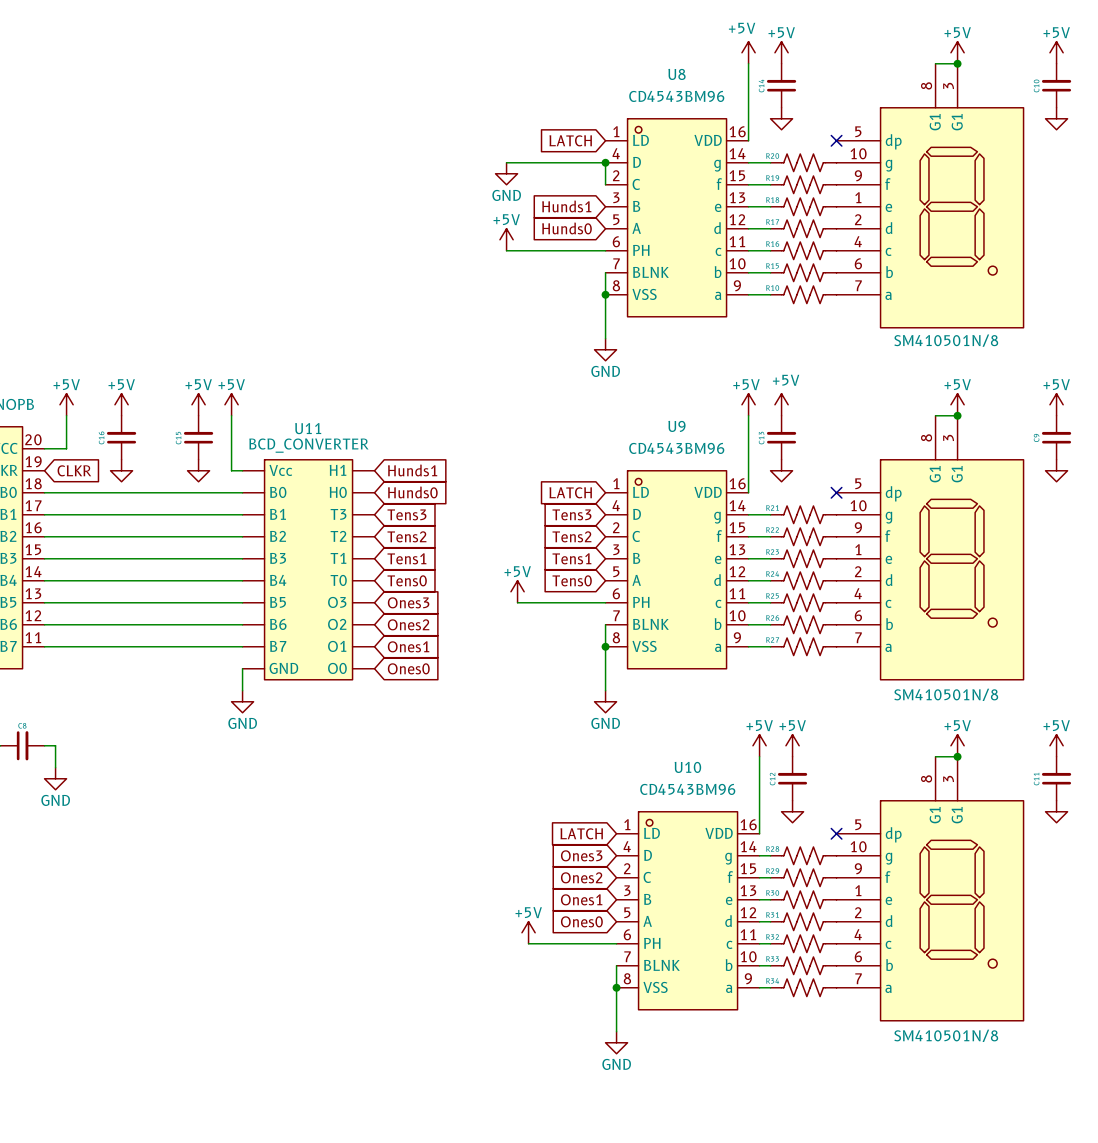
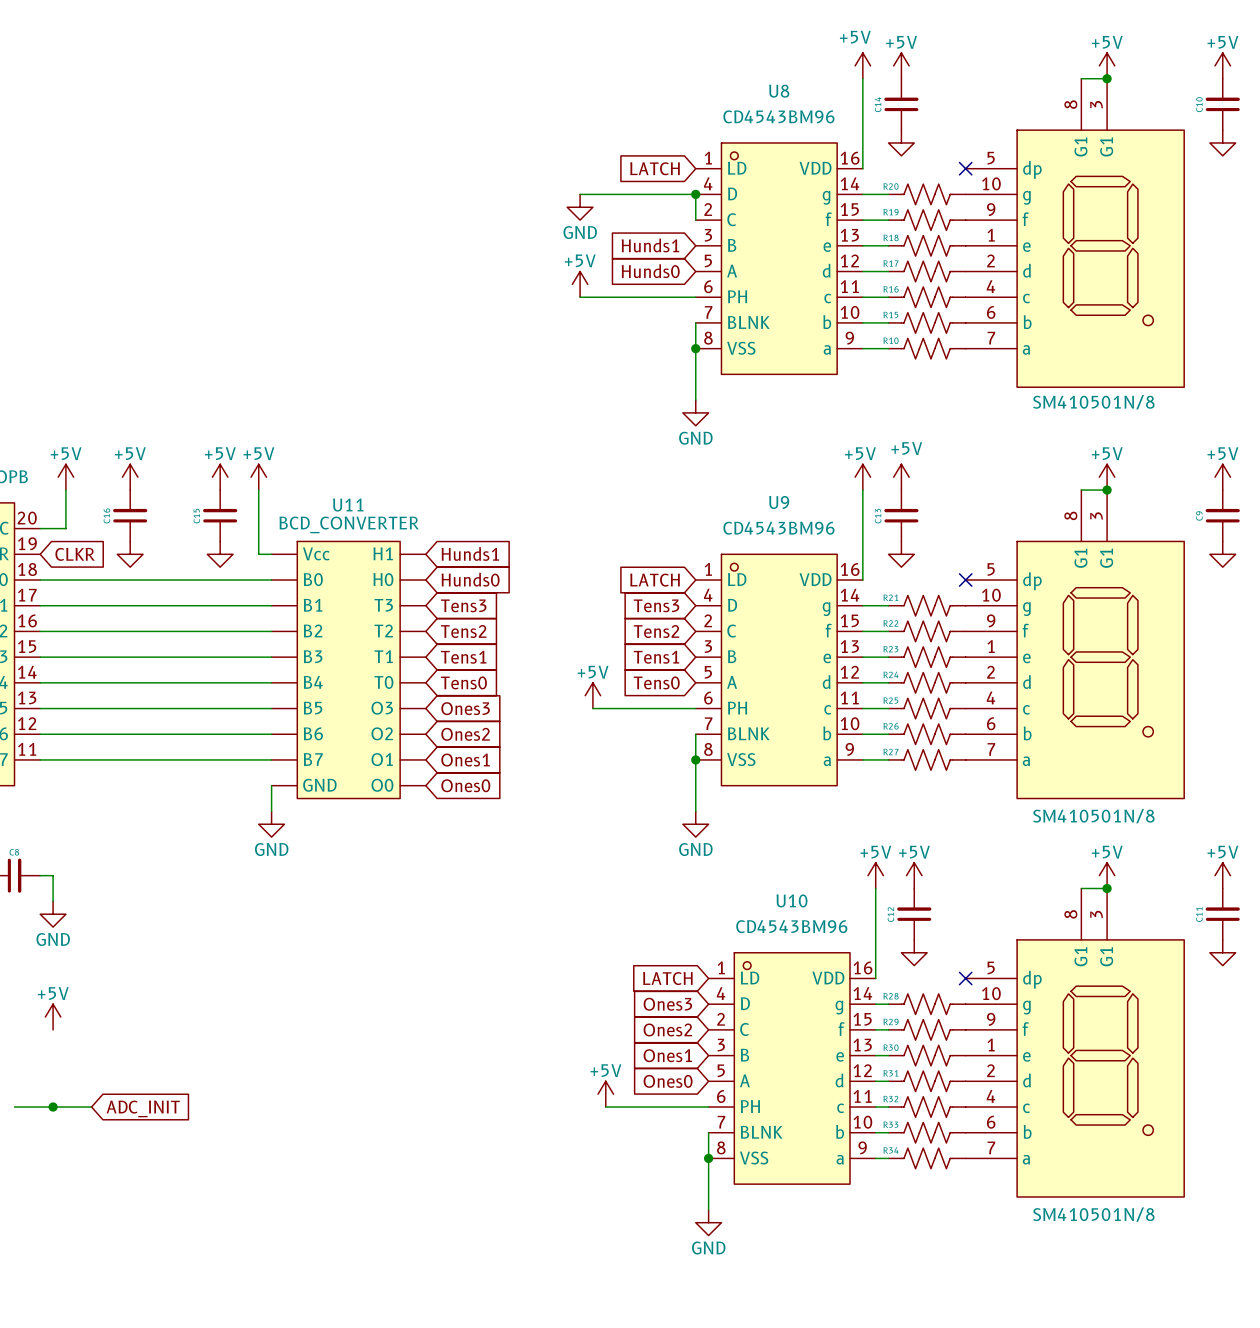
power symbol: none -> +5V (53, 1017)
wire: none -> (14, 1107) (91, 1107)
junction: none -> (53, 1107)
global label: none -> ADC_INIT (143, 1108)

